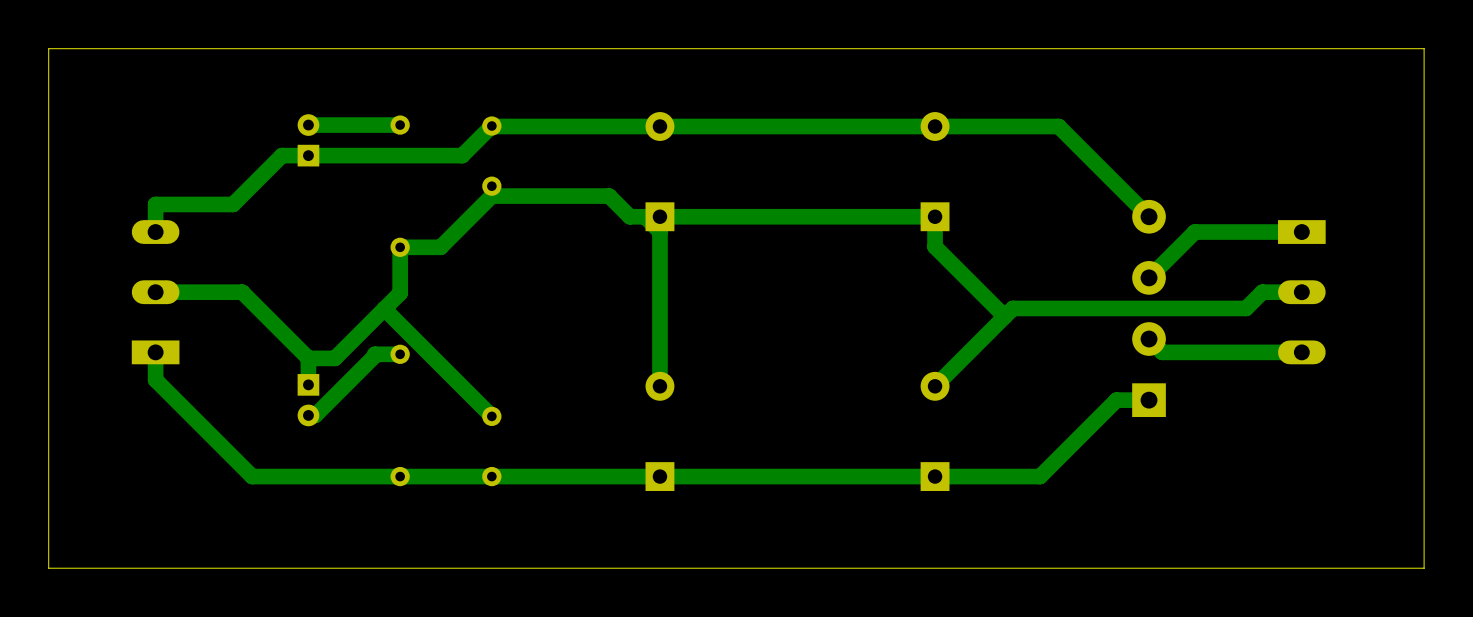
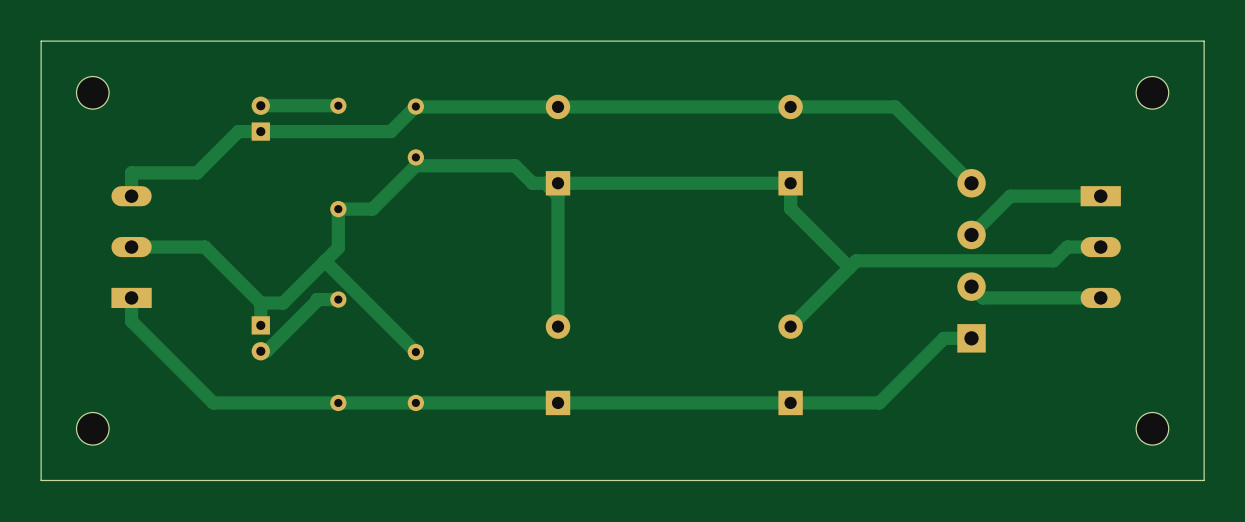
part: none -> (92, 92)
part: none -> (1152, 92)
part: none -> (92, 428)
part: none -> (1152, 428)

